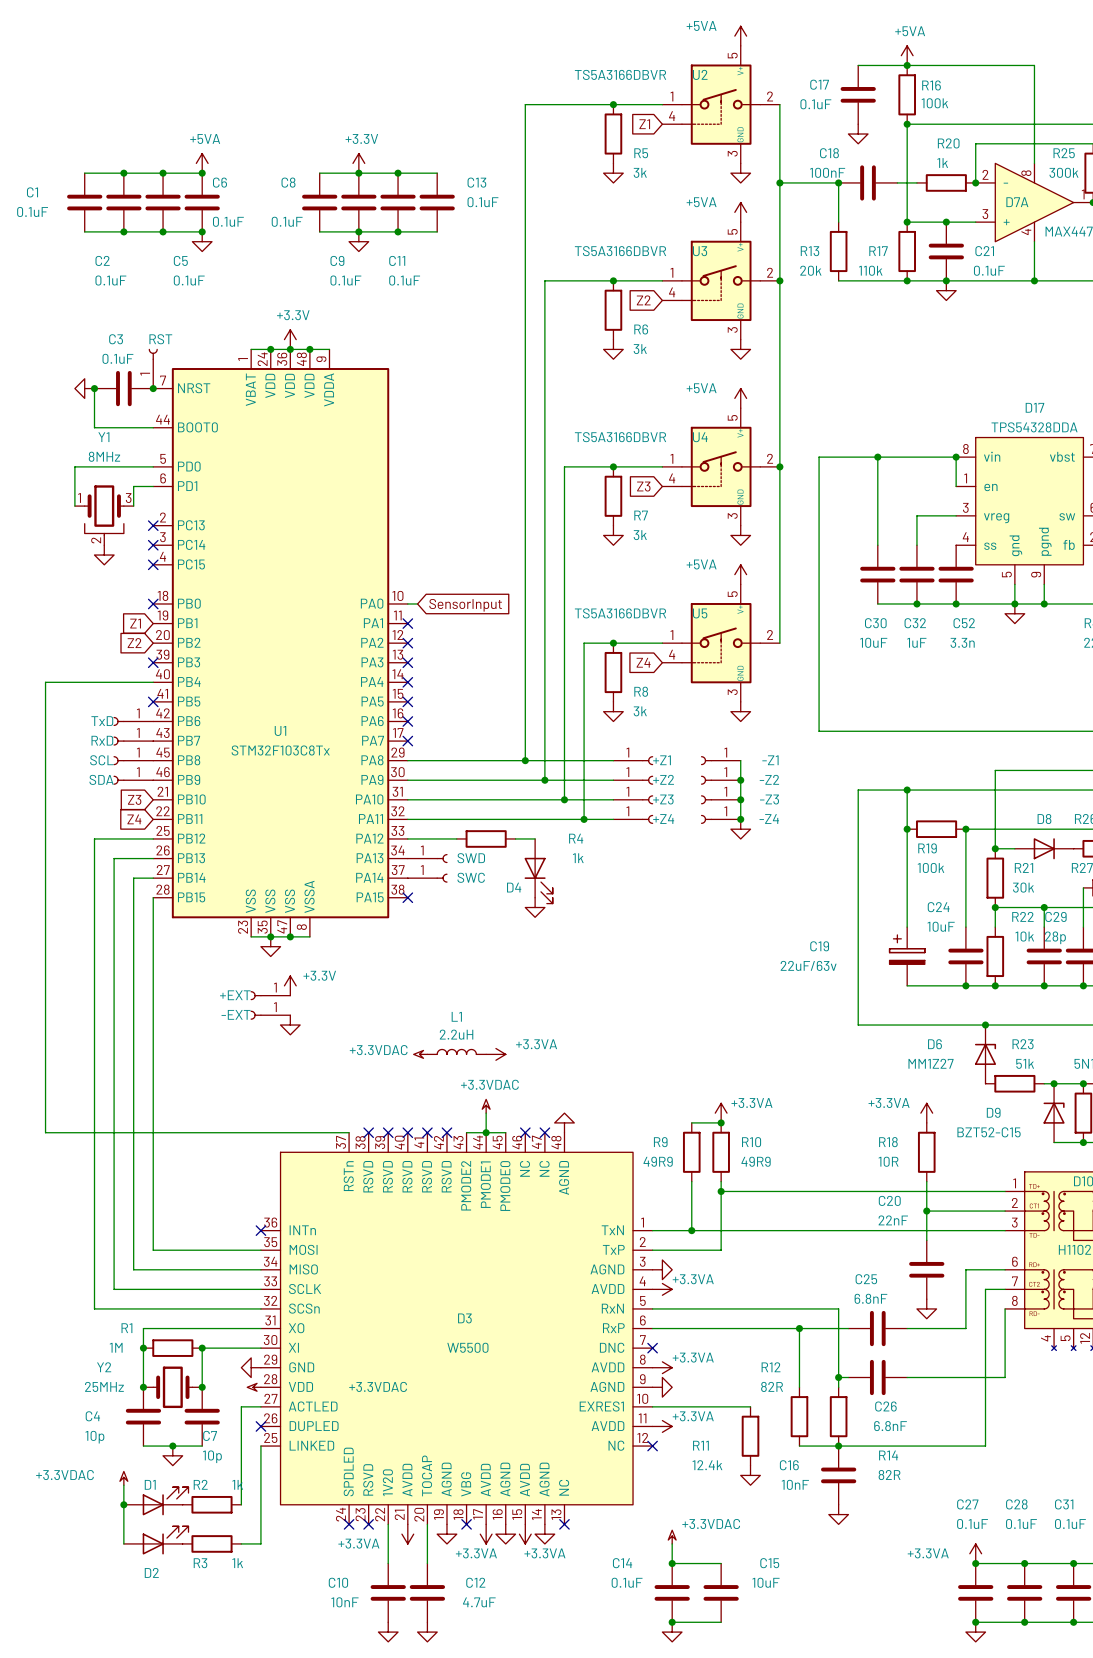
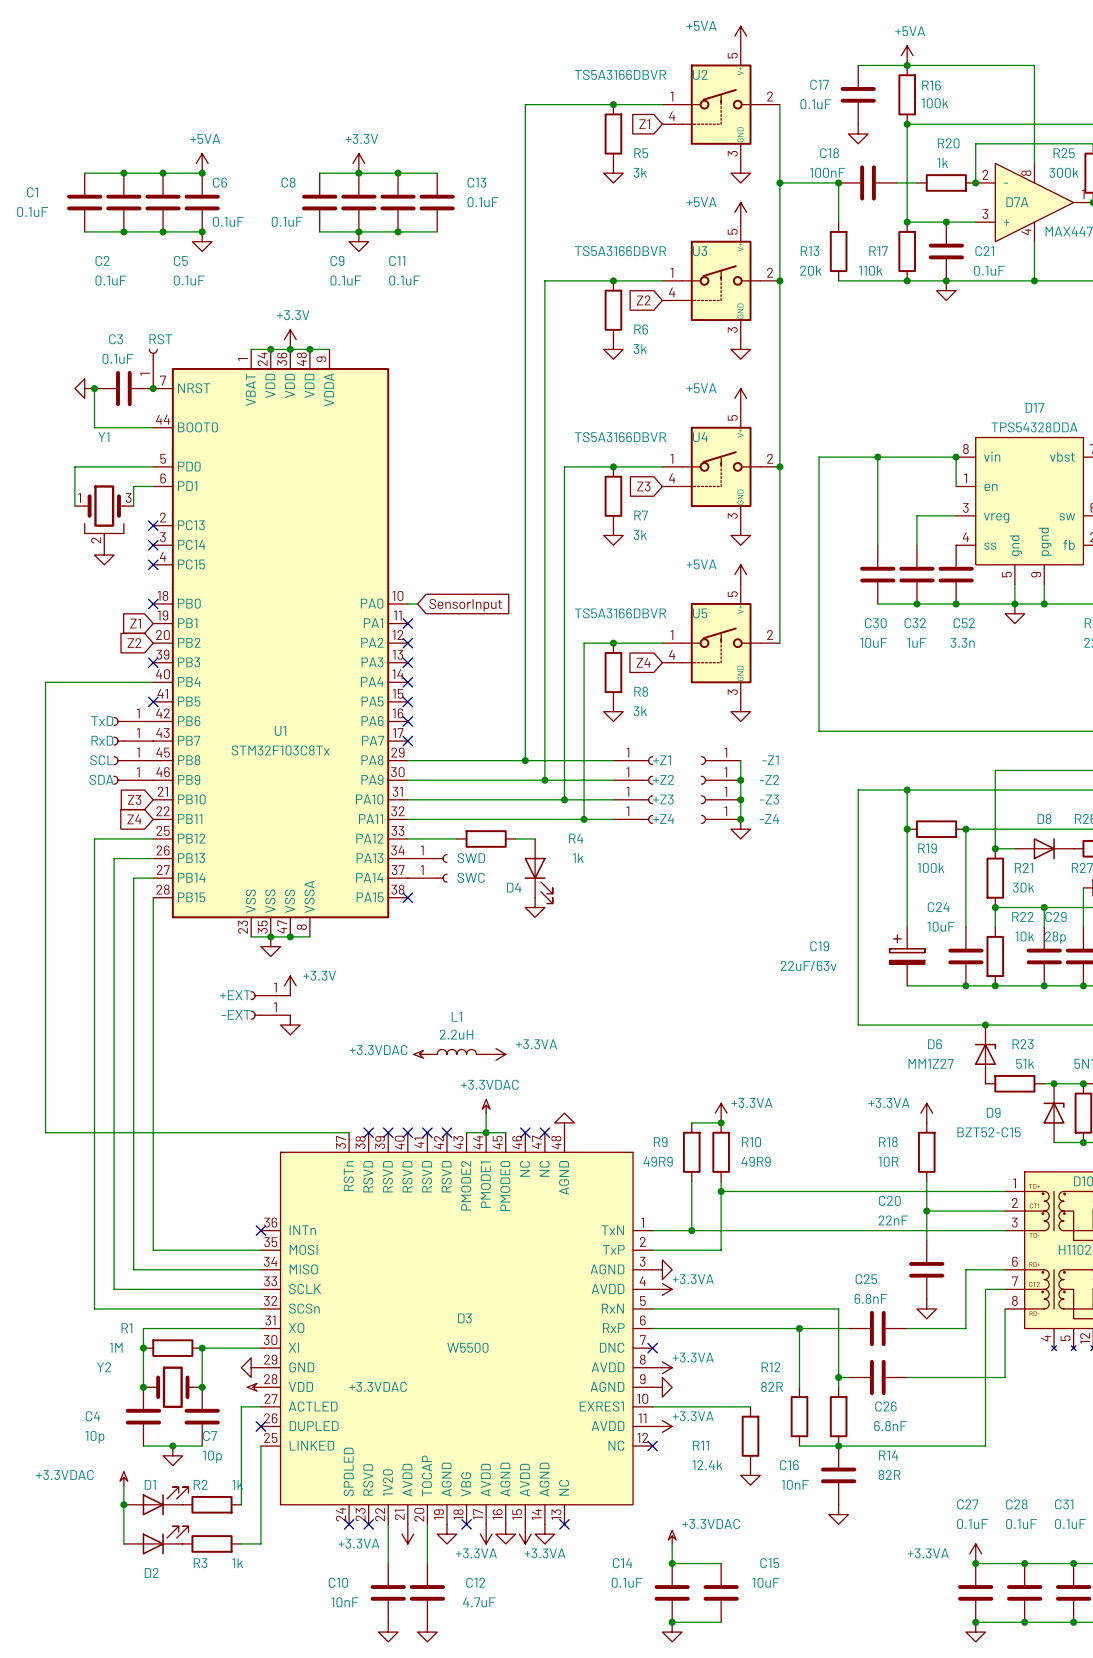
Y1 value: 8MHz (104, 456) -> none
Y2 value: 25MHz (104, 1386) -> none

